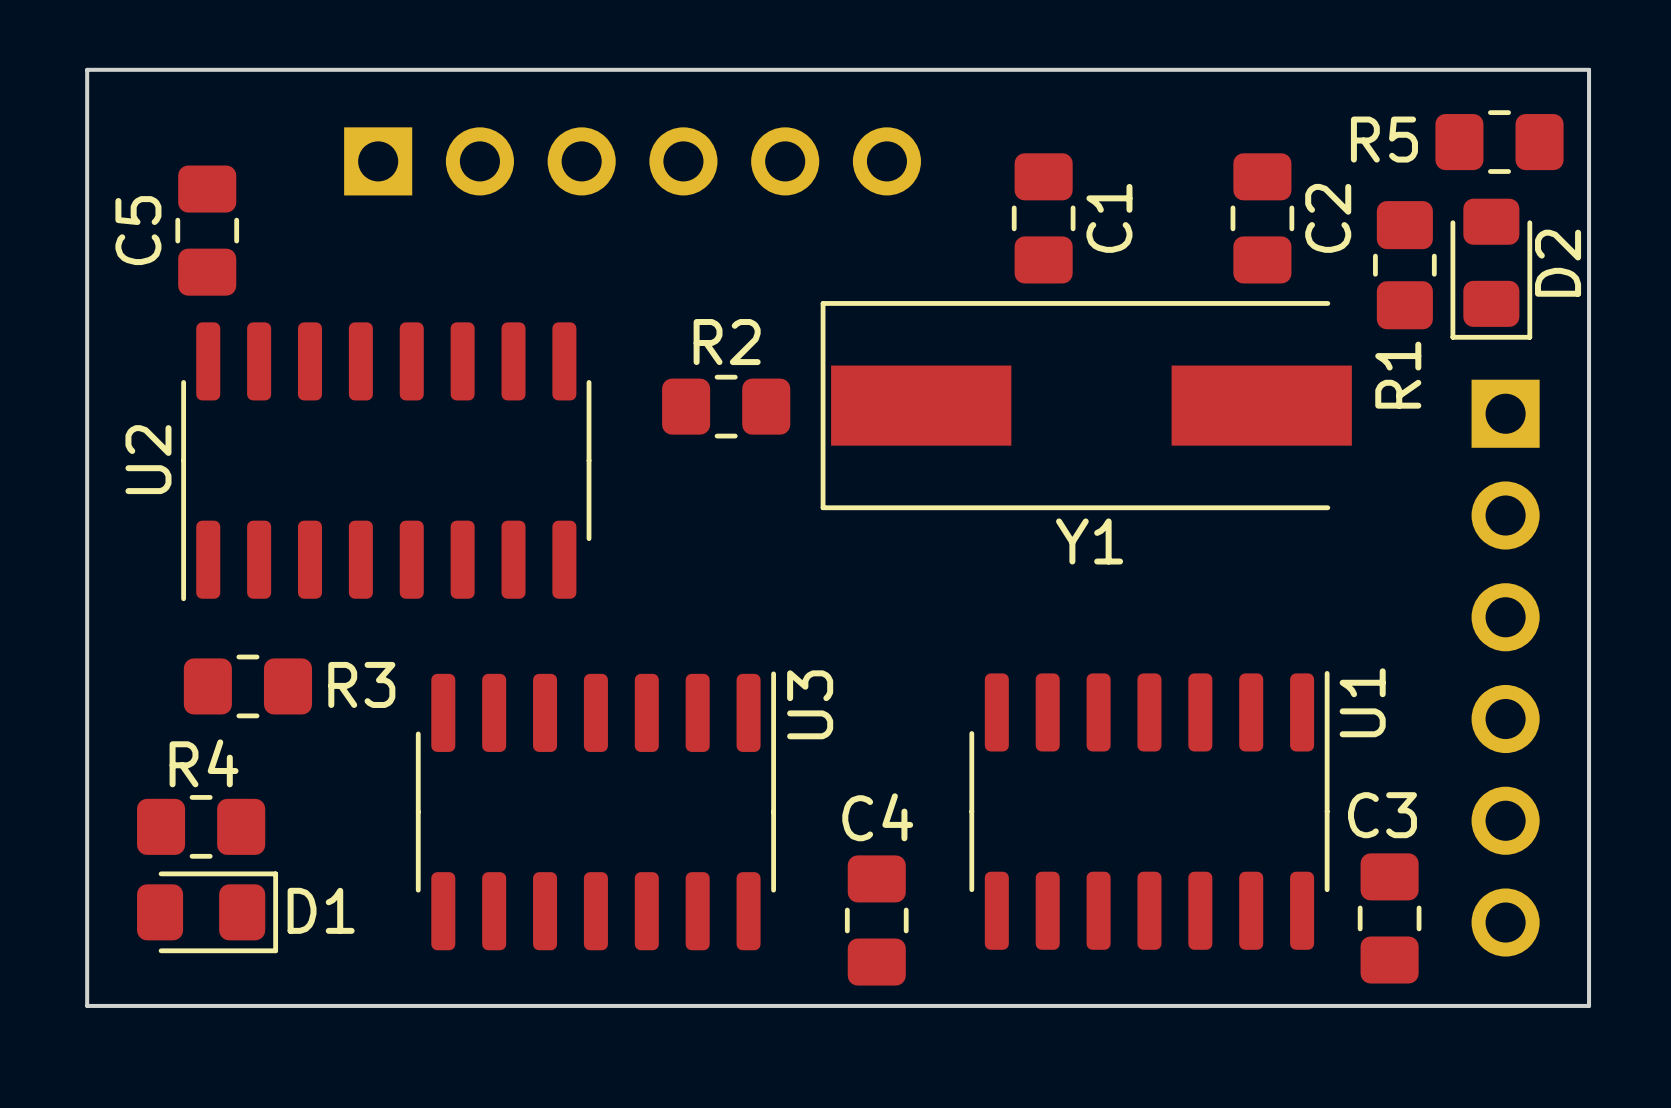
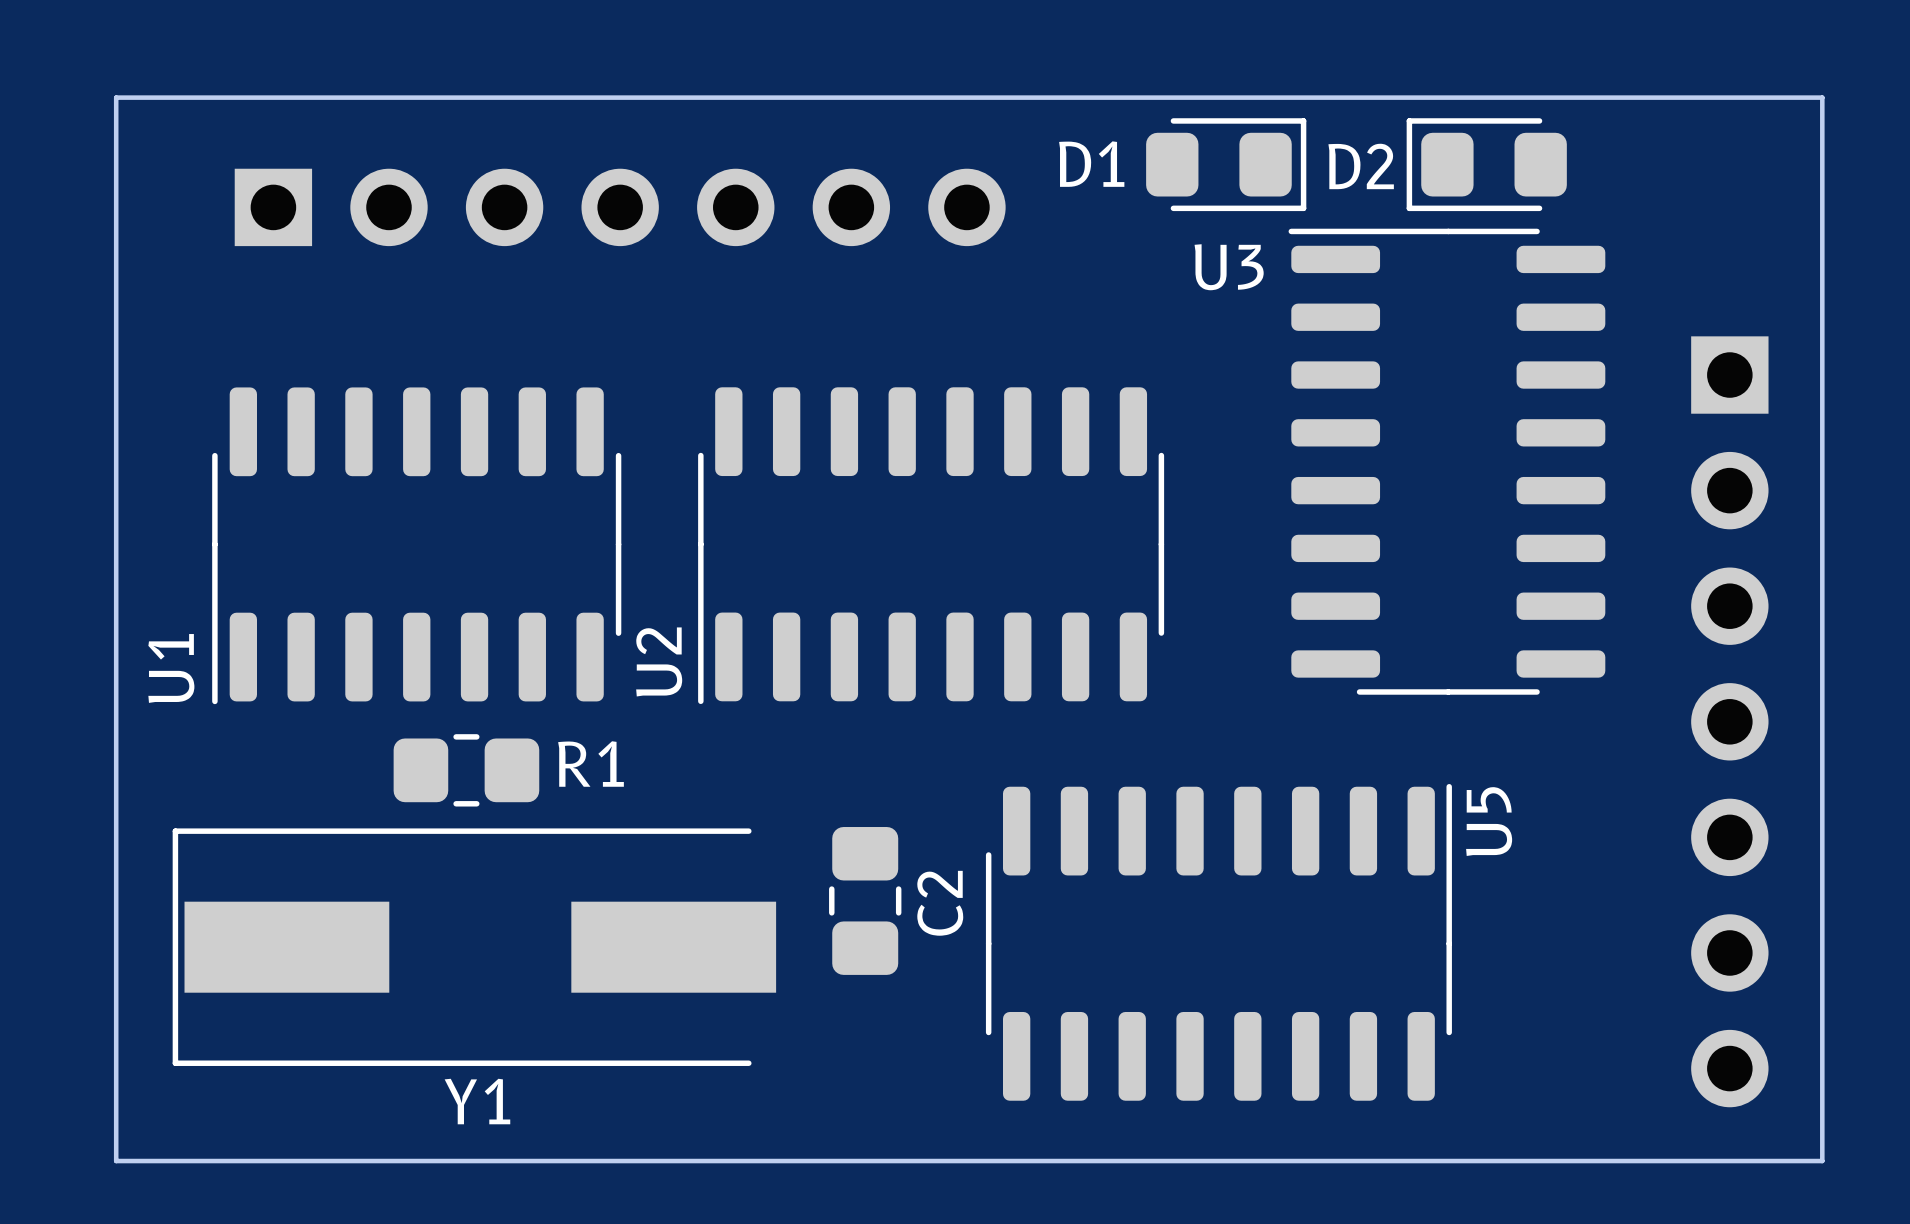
R5: (1499, 142) -> none
part: (632, 161) -> none
part: none -> (620, 207)
C1: (1043, 218) -> none
C2 position: (1262, 218) -> (865, 900)
C5: (207, 230) -> none
D2 name position: D2 (1558, 263) -> D2 (1361, 166)
R1 rotation: 0° (1404, 265) -> 90° clockwise (466, 770)
R1 position: (1404, 265) -> (466, 770)
D2 rotation: 0° (1491, 269) -> 90° clockwise (1486, 164)
D2 position: (1491, 269) -> (1486, 164)
R1 name position: R1 (1398, 375) -> R1 (591, 764)
Y1 position: (1086, 405) -> (474, 947)
R2: (726, 406) -> none
U2 name position: U2 (148, 459) -> U2 (659, 661)
U2 position: (386, 461) -> (931, 545)
part: none -> (1729, 721)
part: (1505, 668) -> none
U3 footprint: [415, 671, 777, 951] -> [1288, 228, 1606, 695]
R3: (247, 686) -> none
U3 name position: U3 (810, 704) -> U3 (1229, 267)
U1 rotation: 0° (1149, 810) -> 180° (416, 545)
U1 position: (1149, 810) -> (416, 545)
U5: none -> (1218, 942)
R4: (201, 826) -> none
D1 name position: D1 (321, 910) -> D1 (1091, 164)
D1 position: (207, 912) -> (1226, 164)
C3: (1389, 918) -> none
C4: (876, 920) -> none

